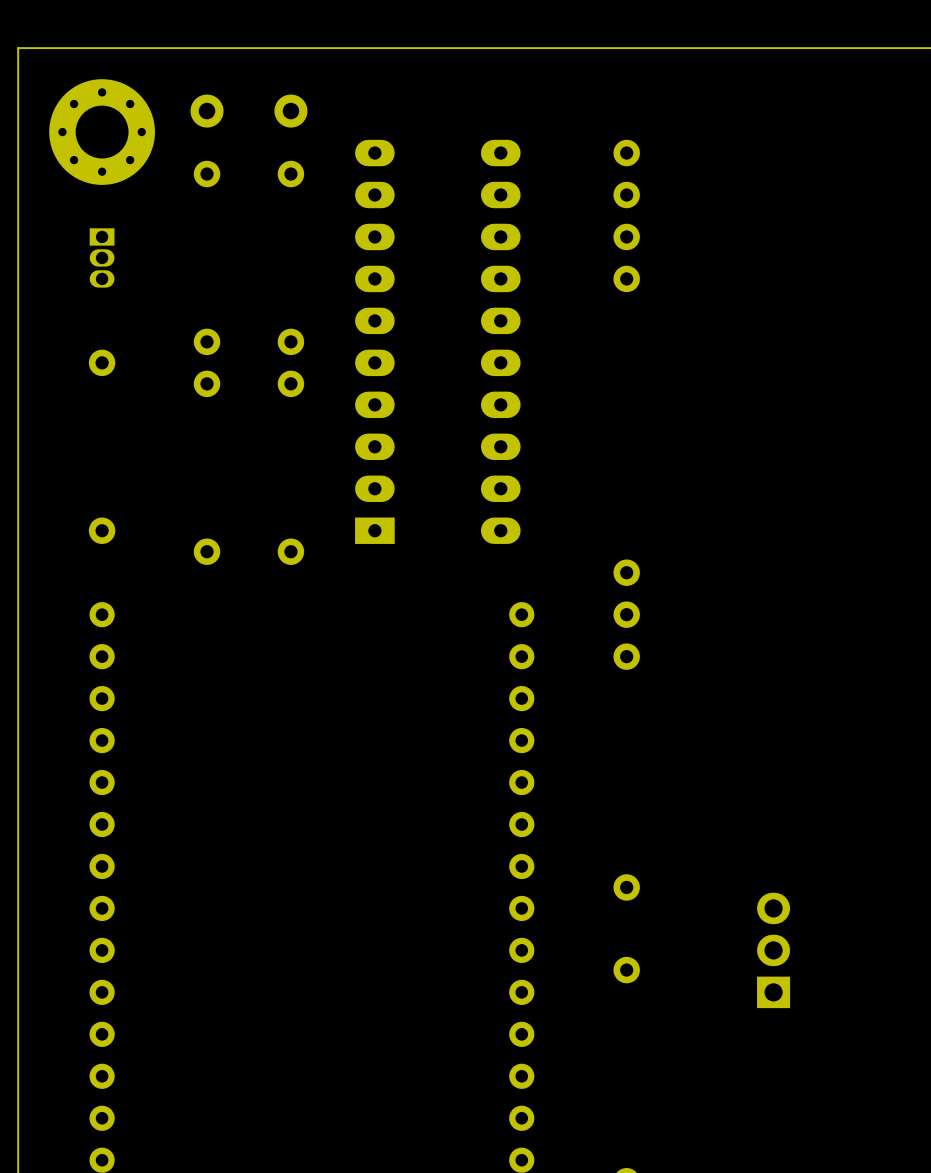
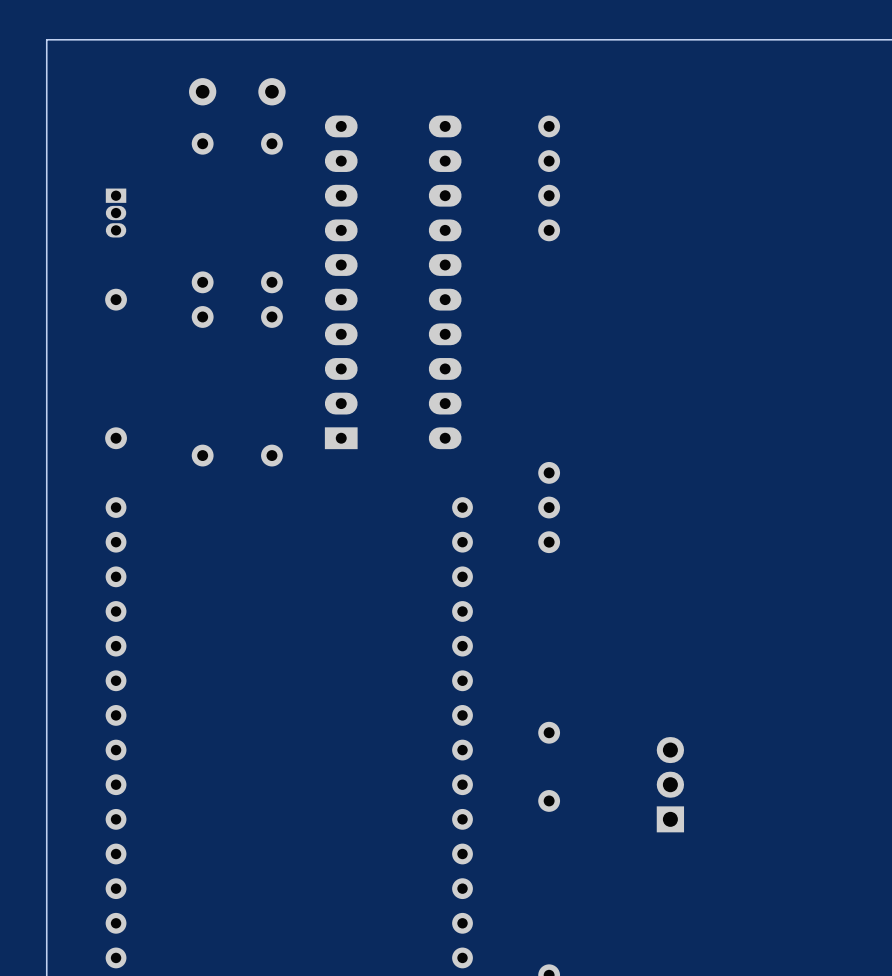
part: (102, 132) -> none

